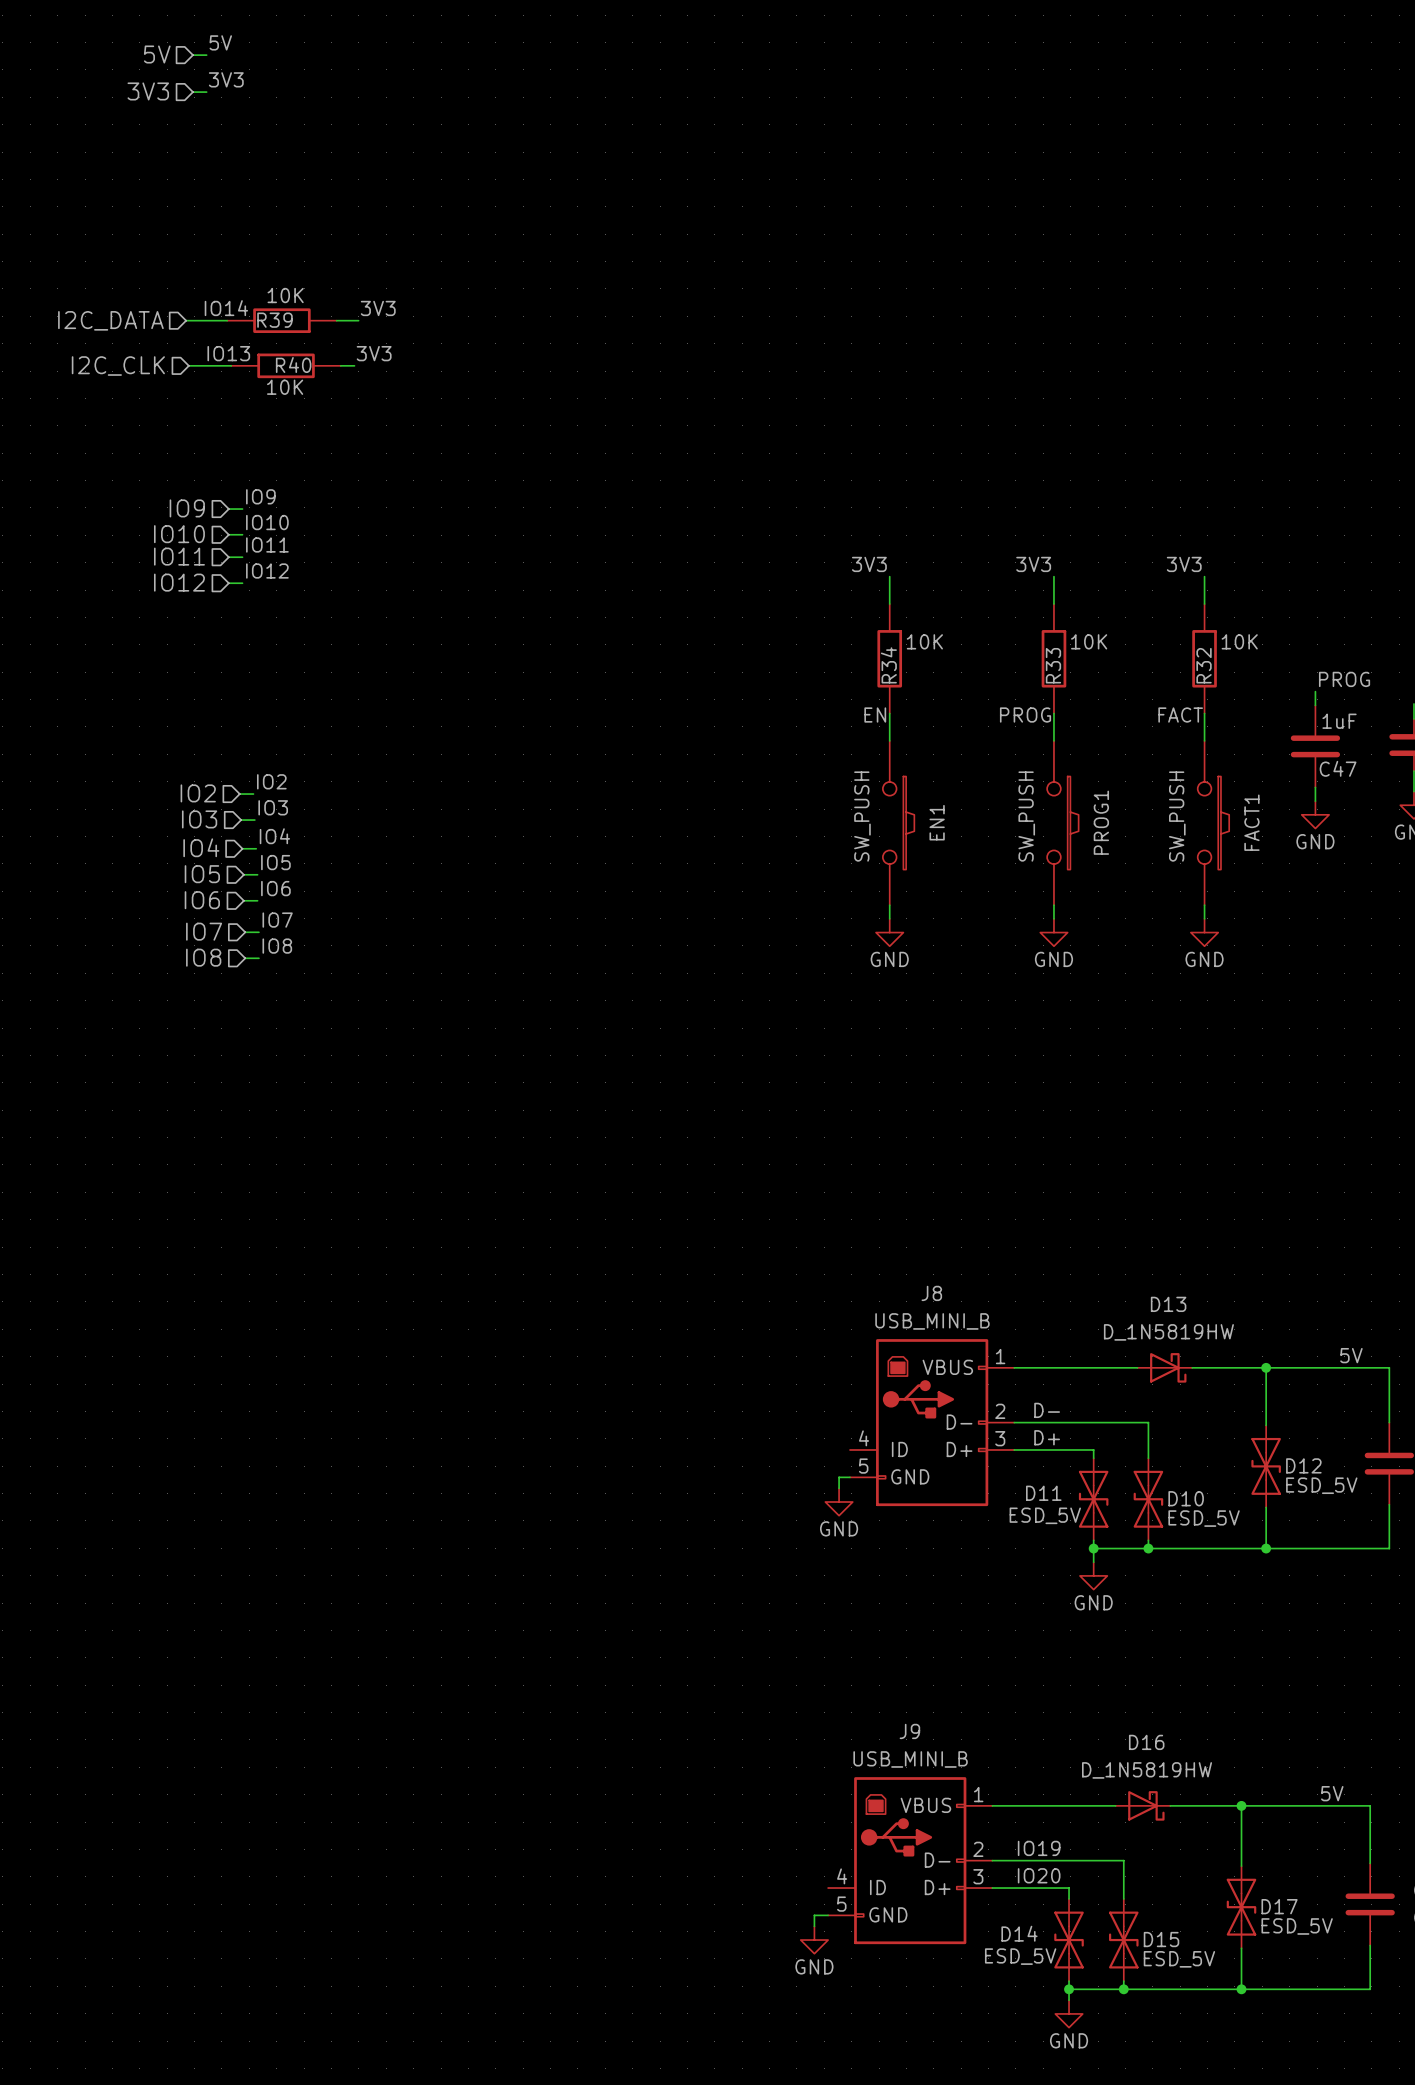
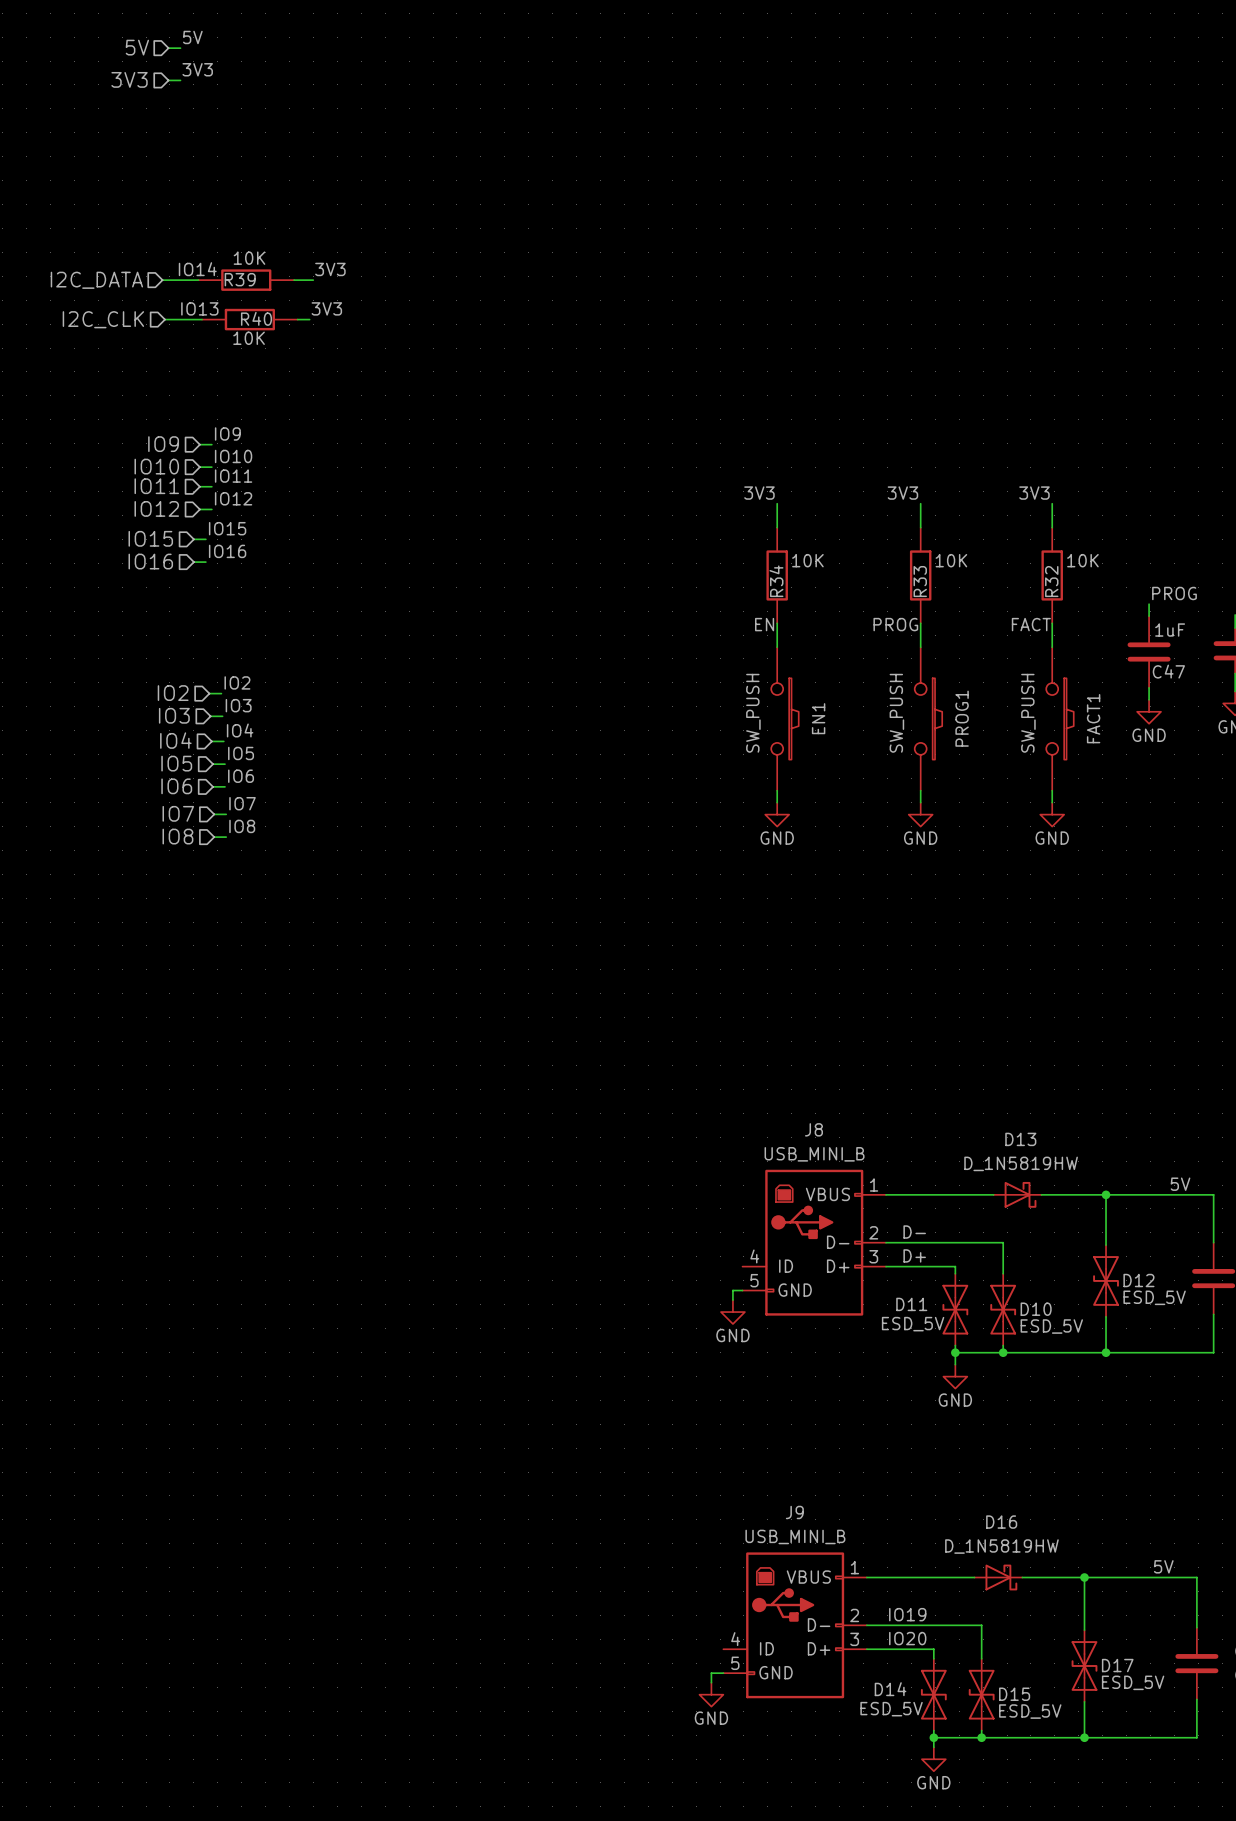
label: none -> IO15 (227, 528)
hierarchical label: none -> IO15 (150, 538)
wire: none -> (193, 539) (205, 539)
label: none -> IO16 (227, 551)
hierarchical label: none -> IO16 (150, 561)
wire: none -> (193, 562) (205, 562)

